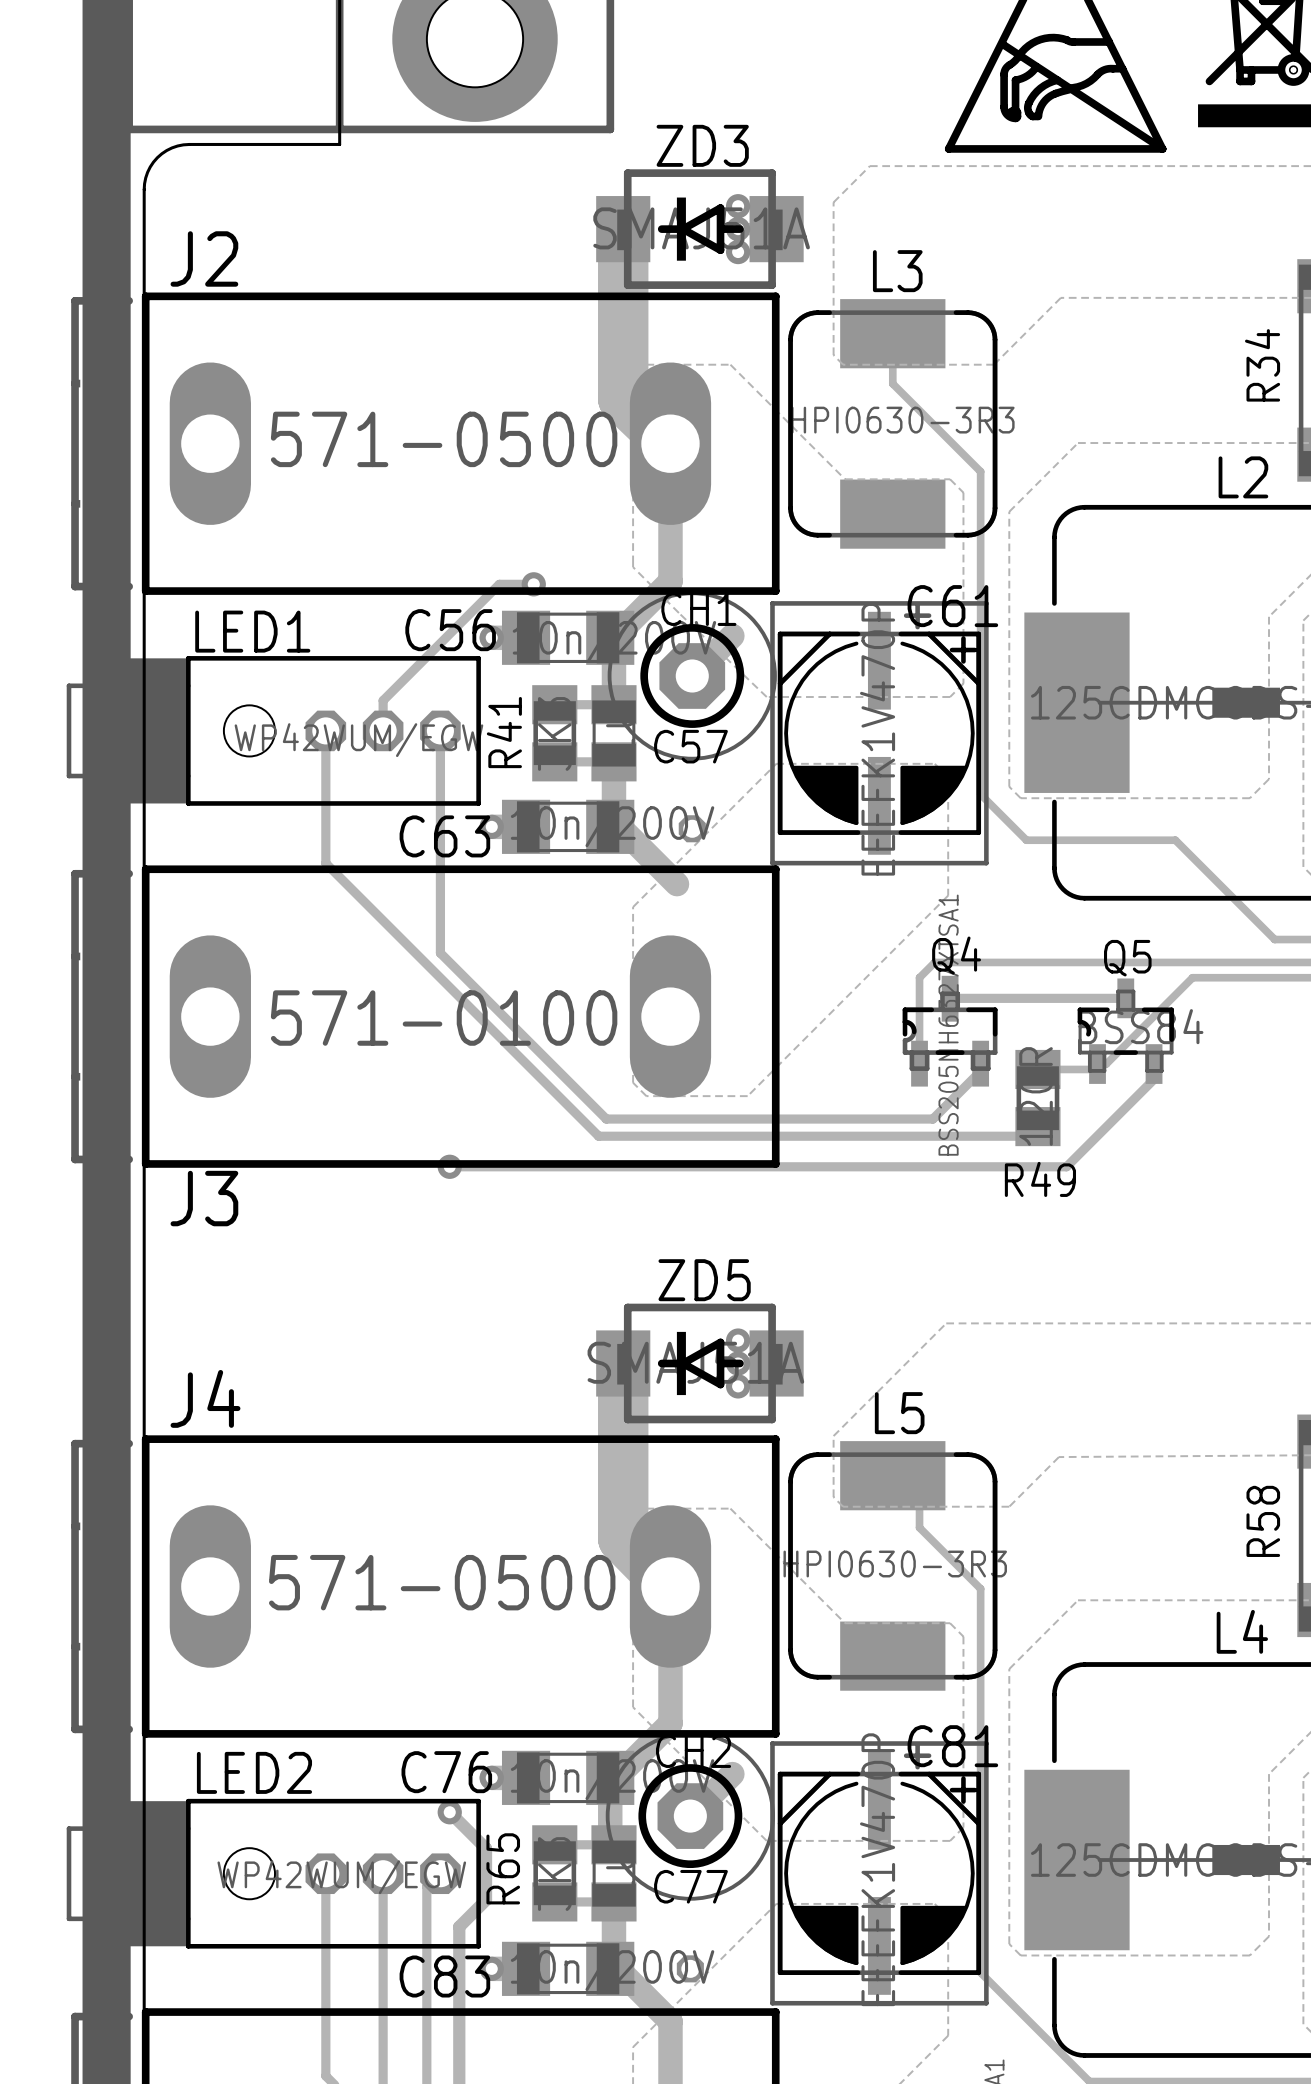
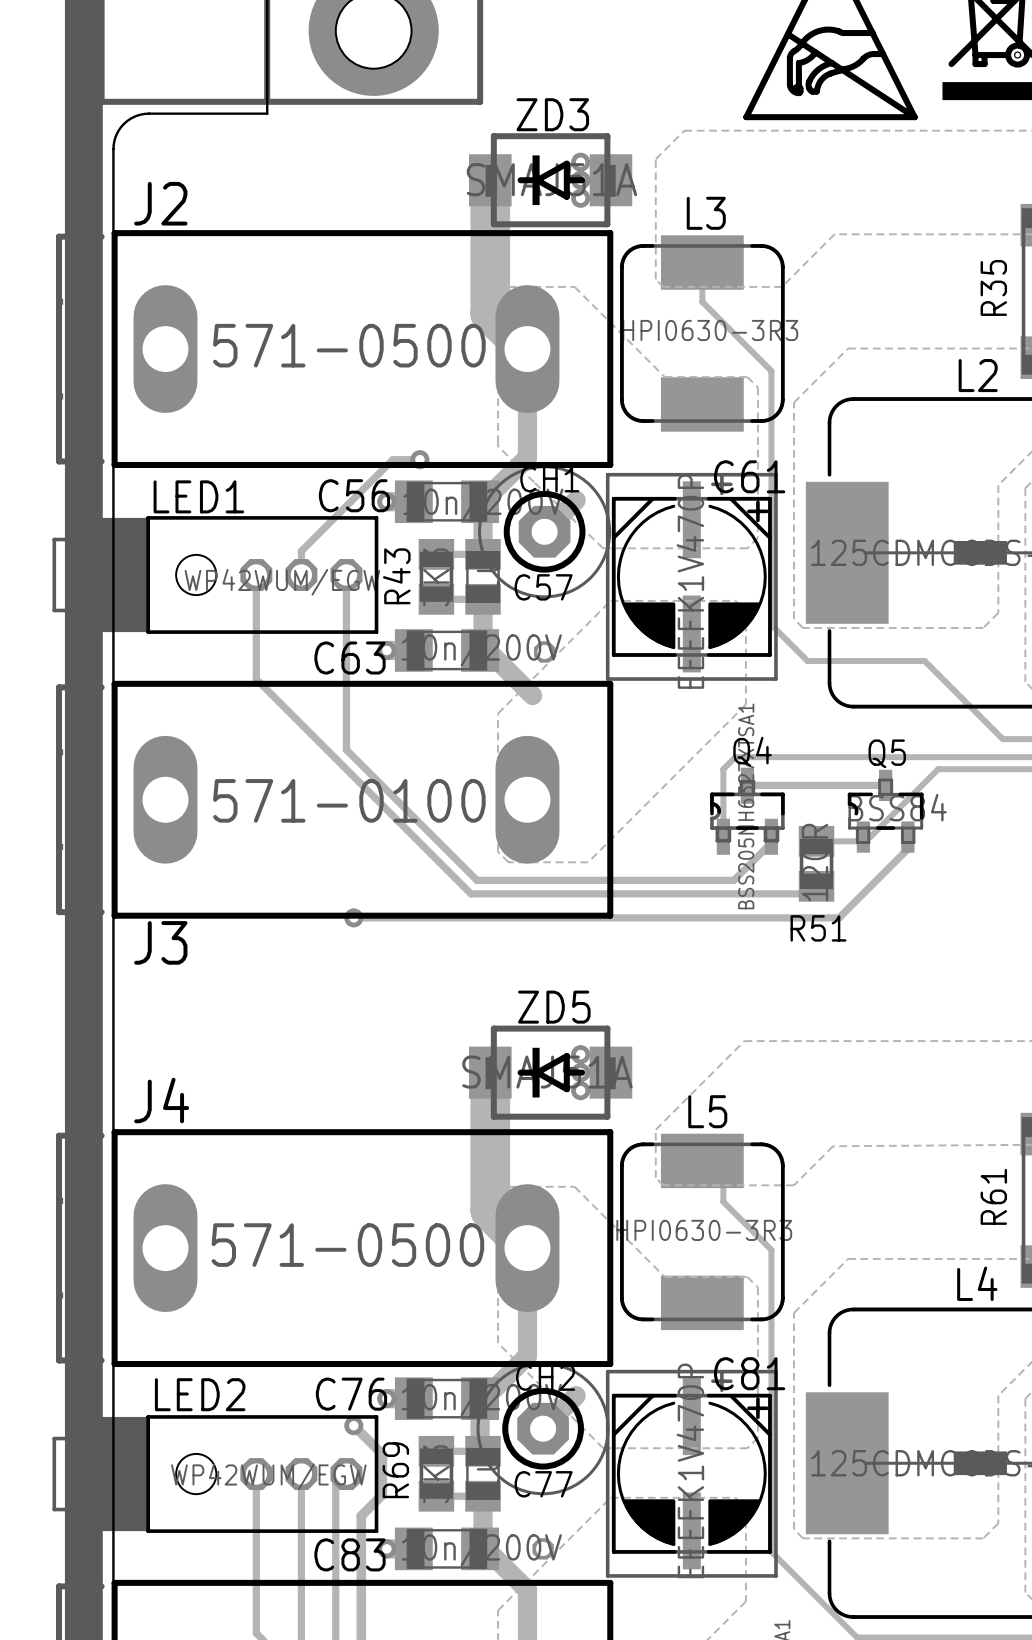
R34 name: R34 (1262, 365) -> R35 (993, 287)
R41 name: R41 (504, 732) -> R43 (396, 576)
R49 name: R49 (1040, 1179) -> R51 (818, 928)
R58 name: R58 (1263, 1521) -> R61 (993, 1196)
R65 name: R65 (503, 1868) -> R69 (395, 1470)

